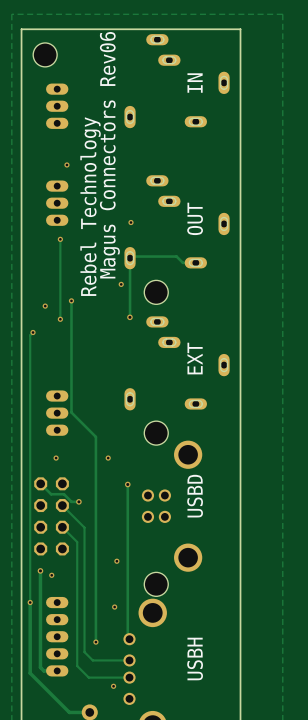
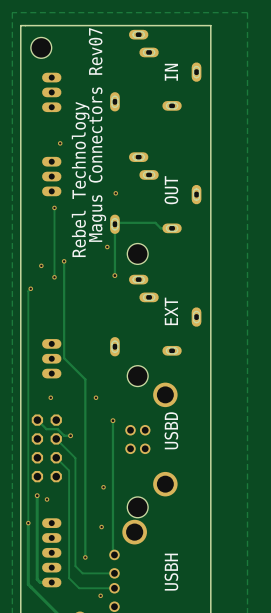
text: Magus Connectors Rev06 (109, 155) -> Magus Connectors Rev07 (97, 135)

